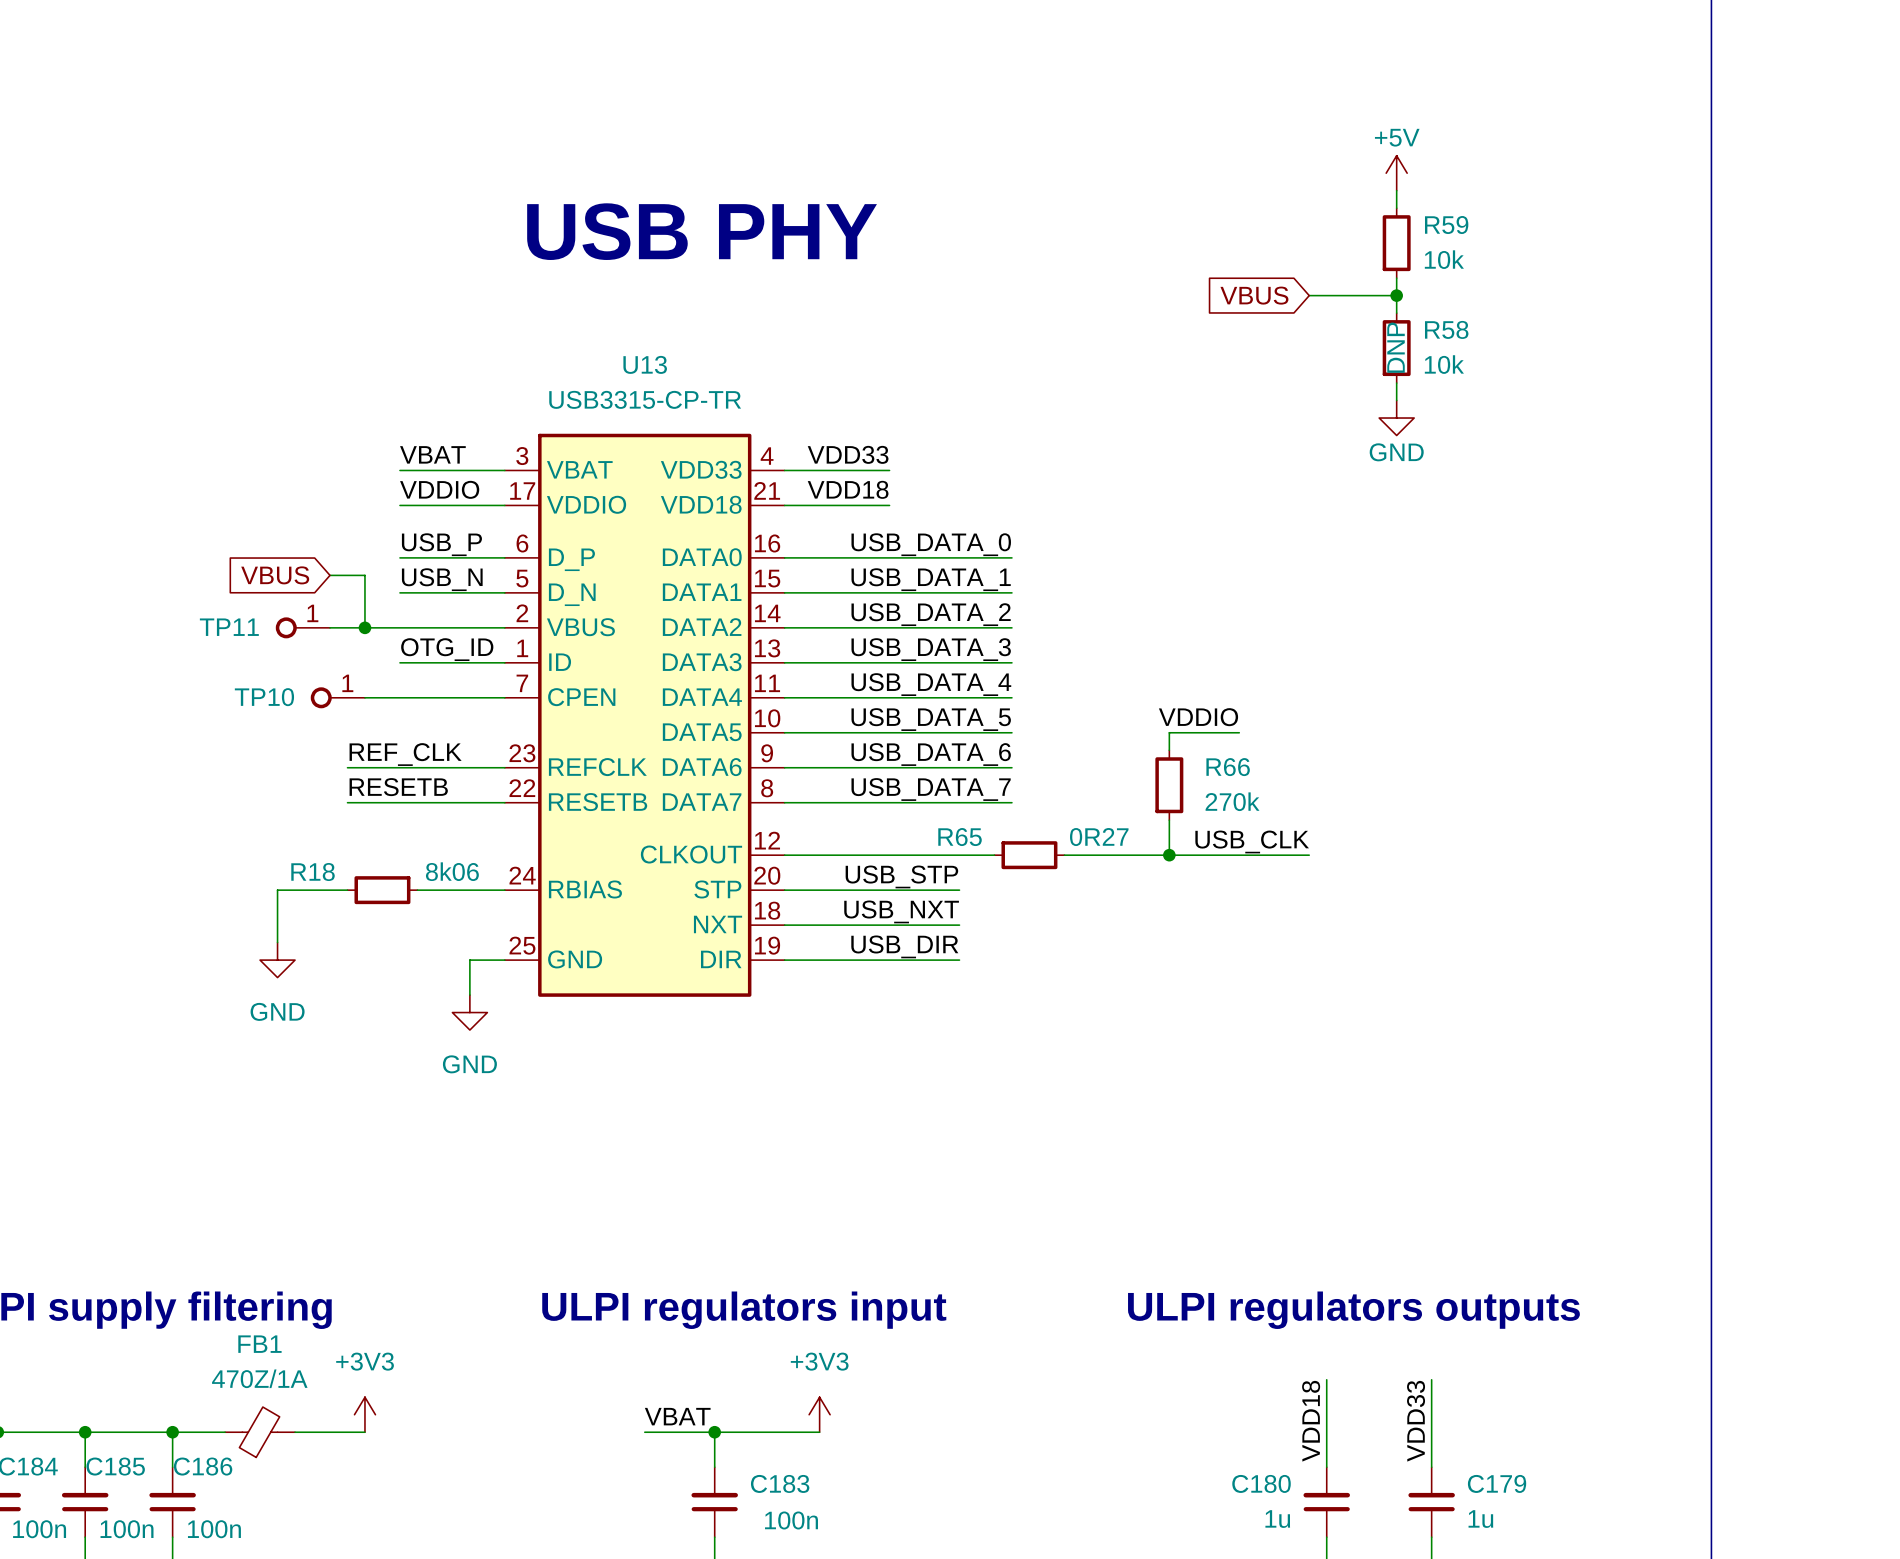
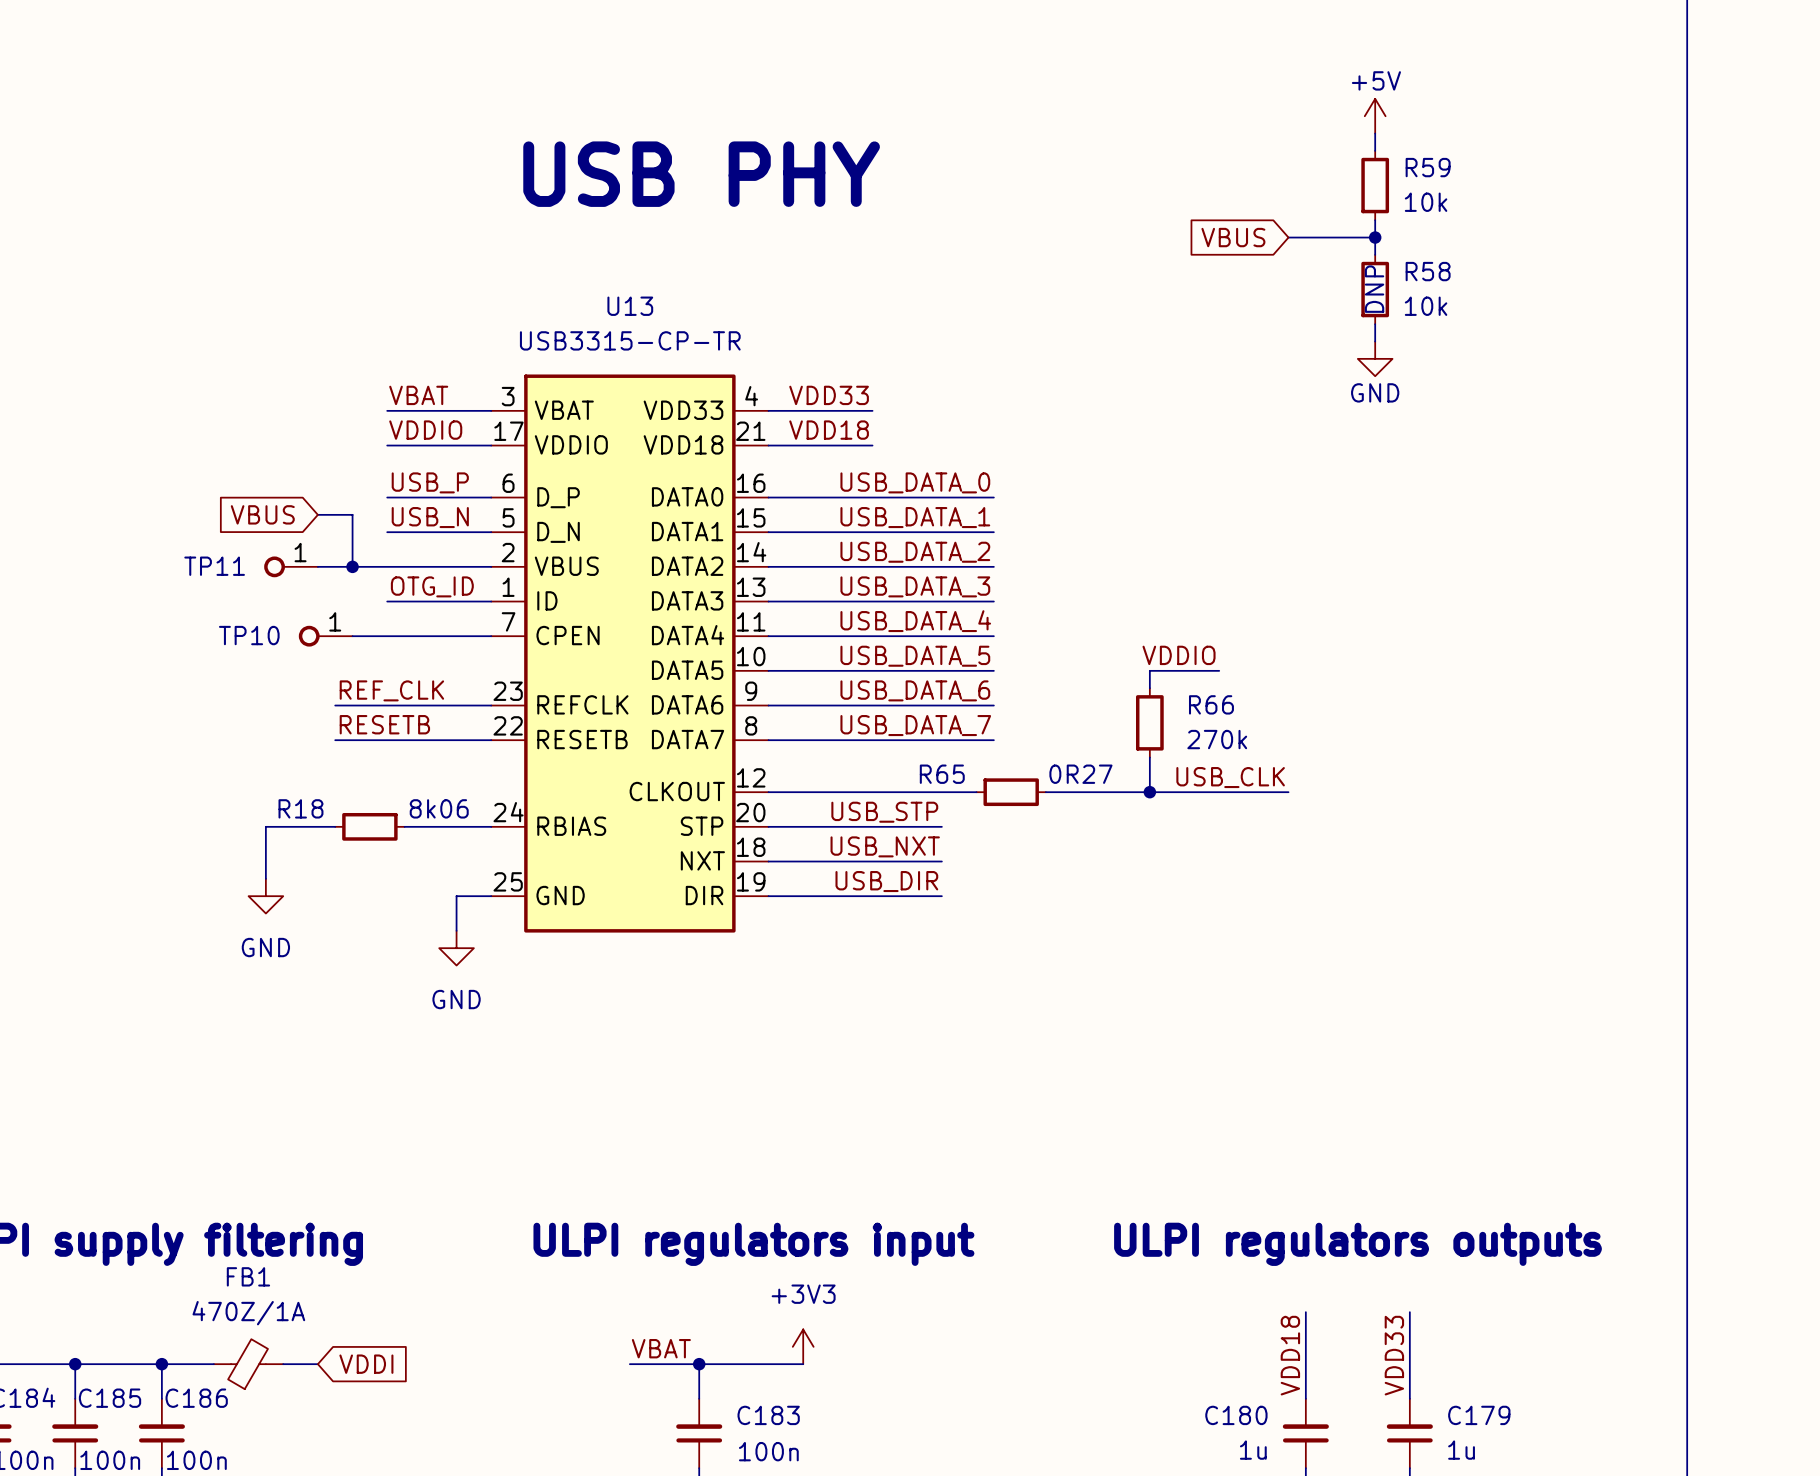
power symbol: +3V3 (364, 1414) -> none
wire: (330, 1432) (364, 1432) -> none
global label: none -> VDDI (366, 1364)

